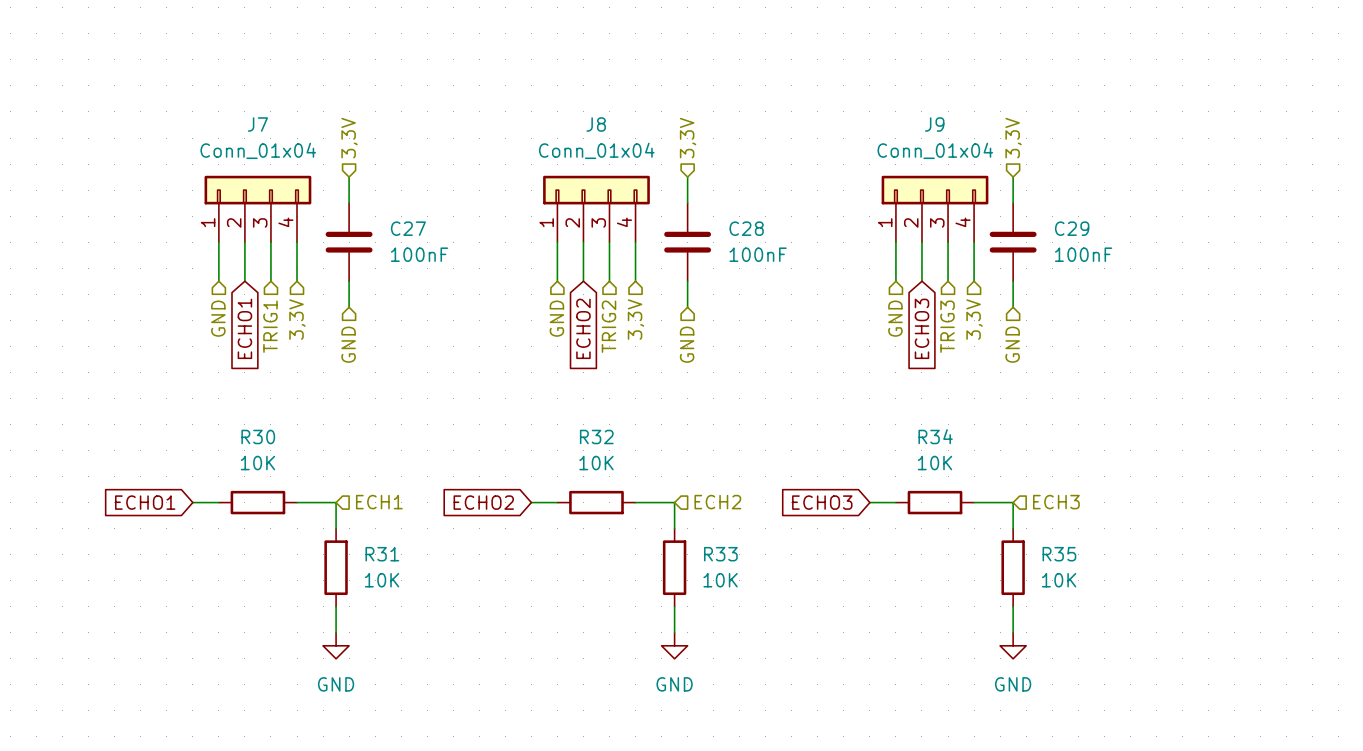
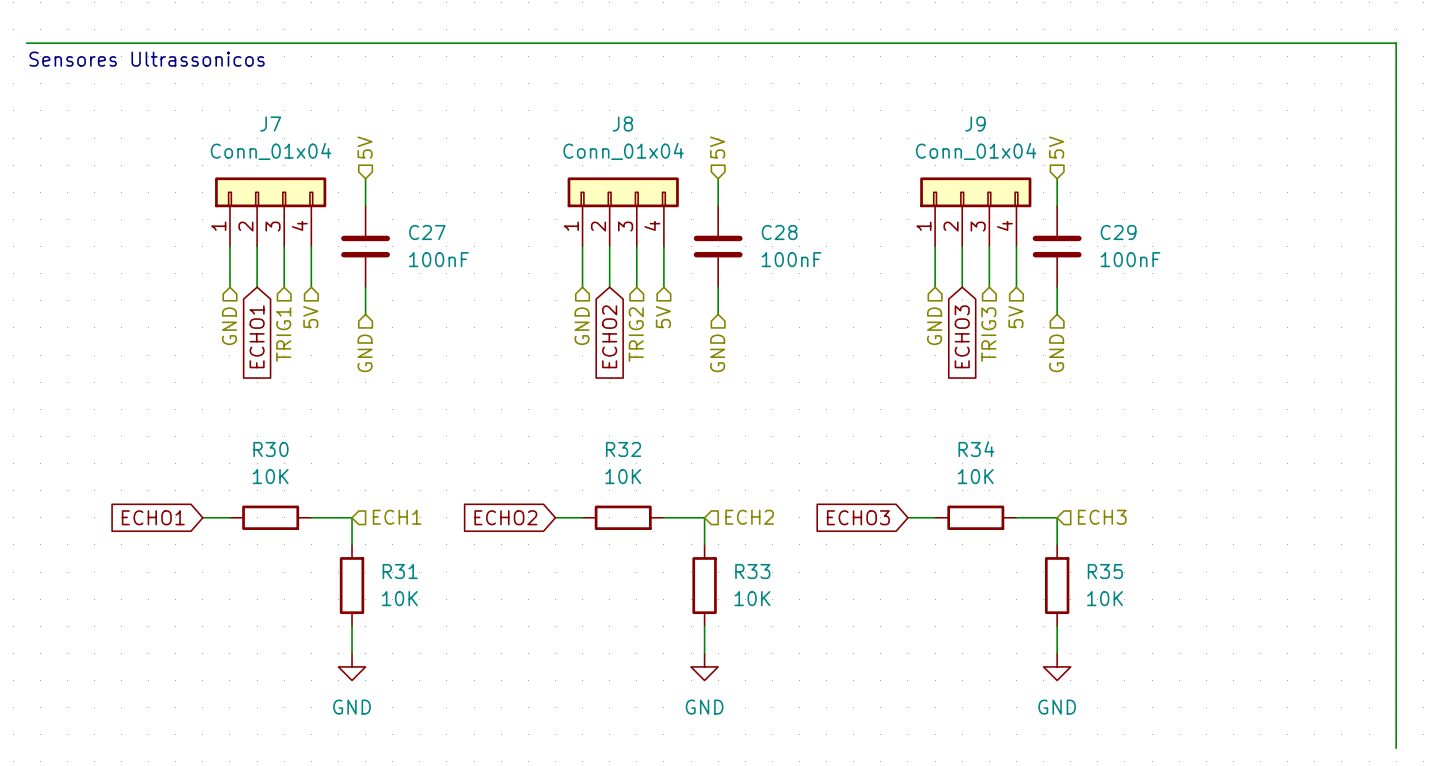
wire: none -> (26, 43) (1396, 43) (1396, 748)
text: none -> Sensores Ultrassonicos (147, 59)
hierarchical label: 3,3V (349, 138) -> 5V (365, 147)
hierarchical label: 3,3V (688, 138) -> 5V (717, 147)
hierarchical label: 3,3V (1013, 138) -> 5V (1056, 147)
hierarchical label: 3,3V (297, 319) -> 5V (310, 317)
hierarchical label: 3,3V (635, 319) -> 5V (663, 317)
hierarchical label: 3,3V (974, 319) -> 5V (1015, 317)

